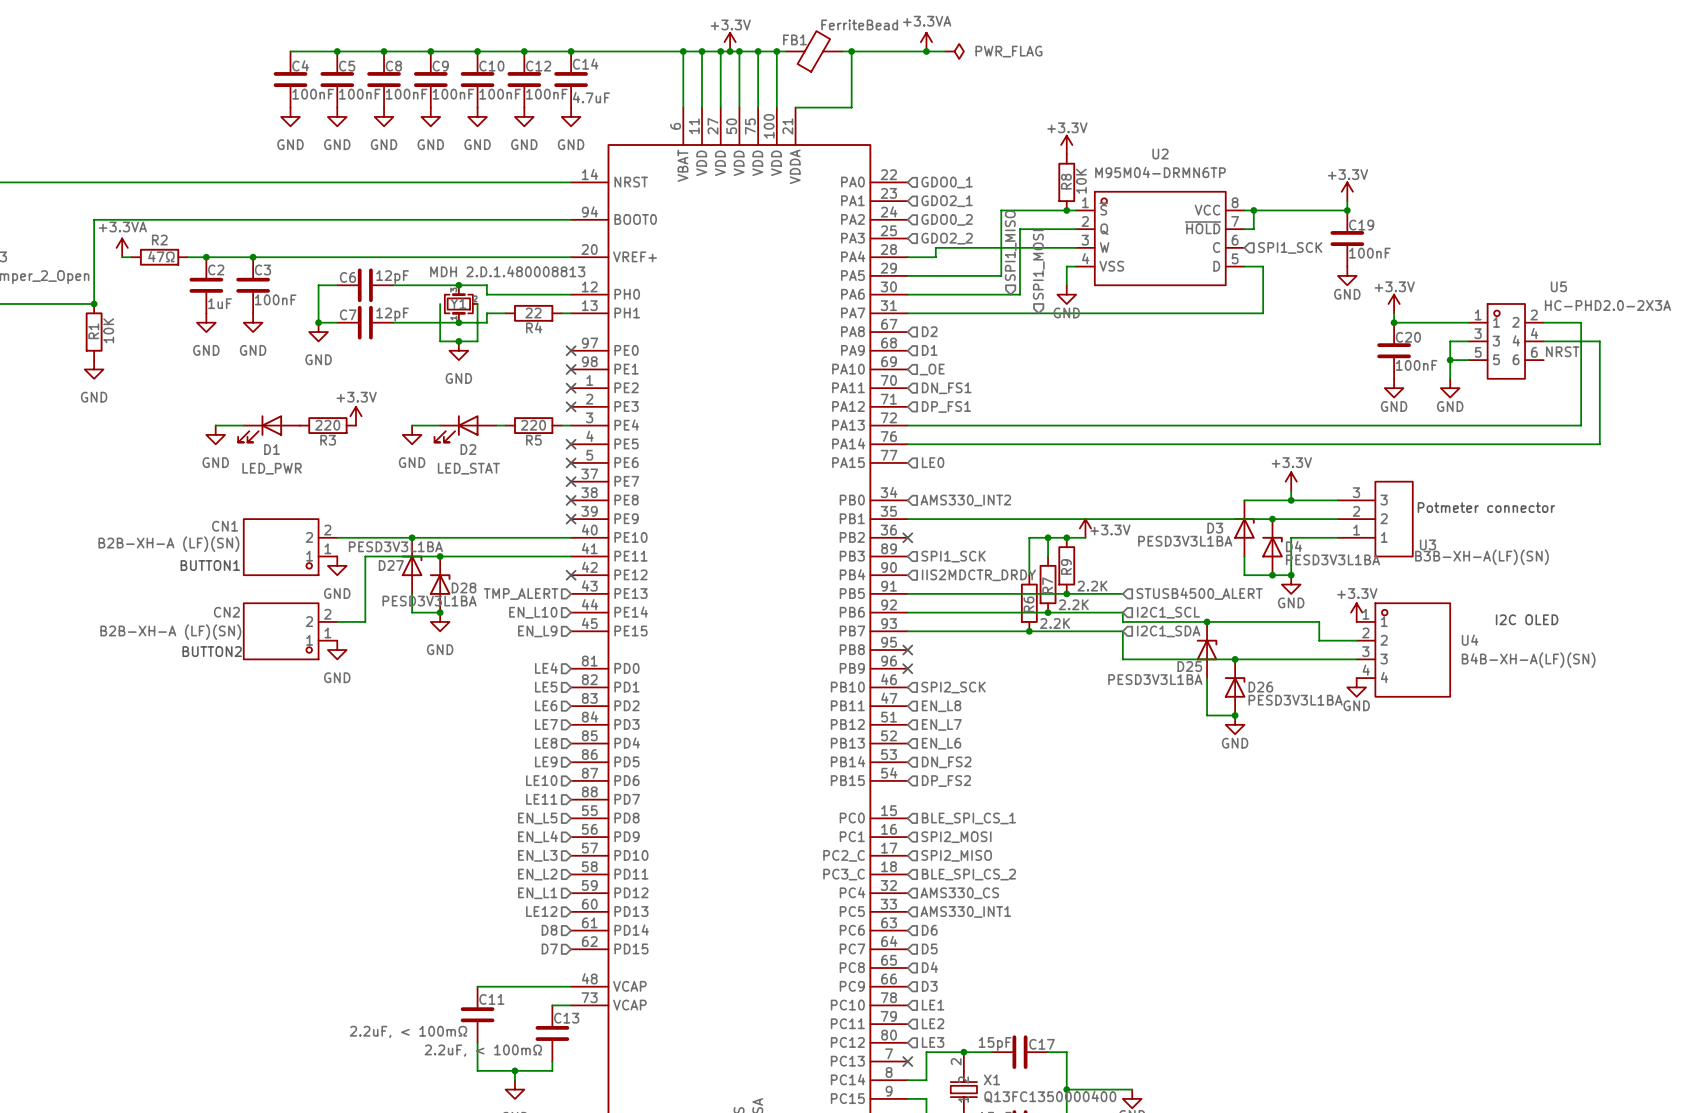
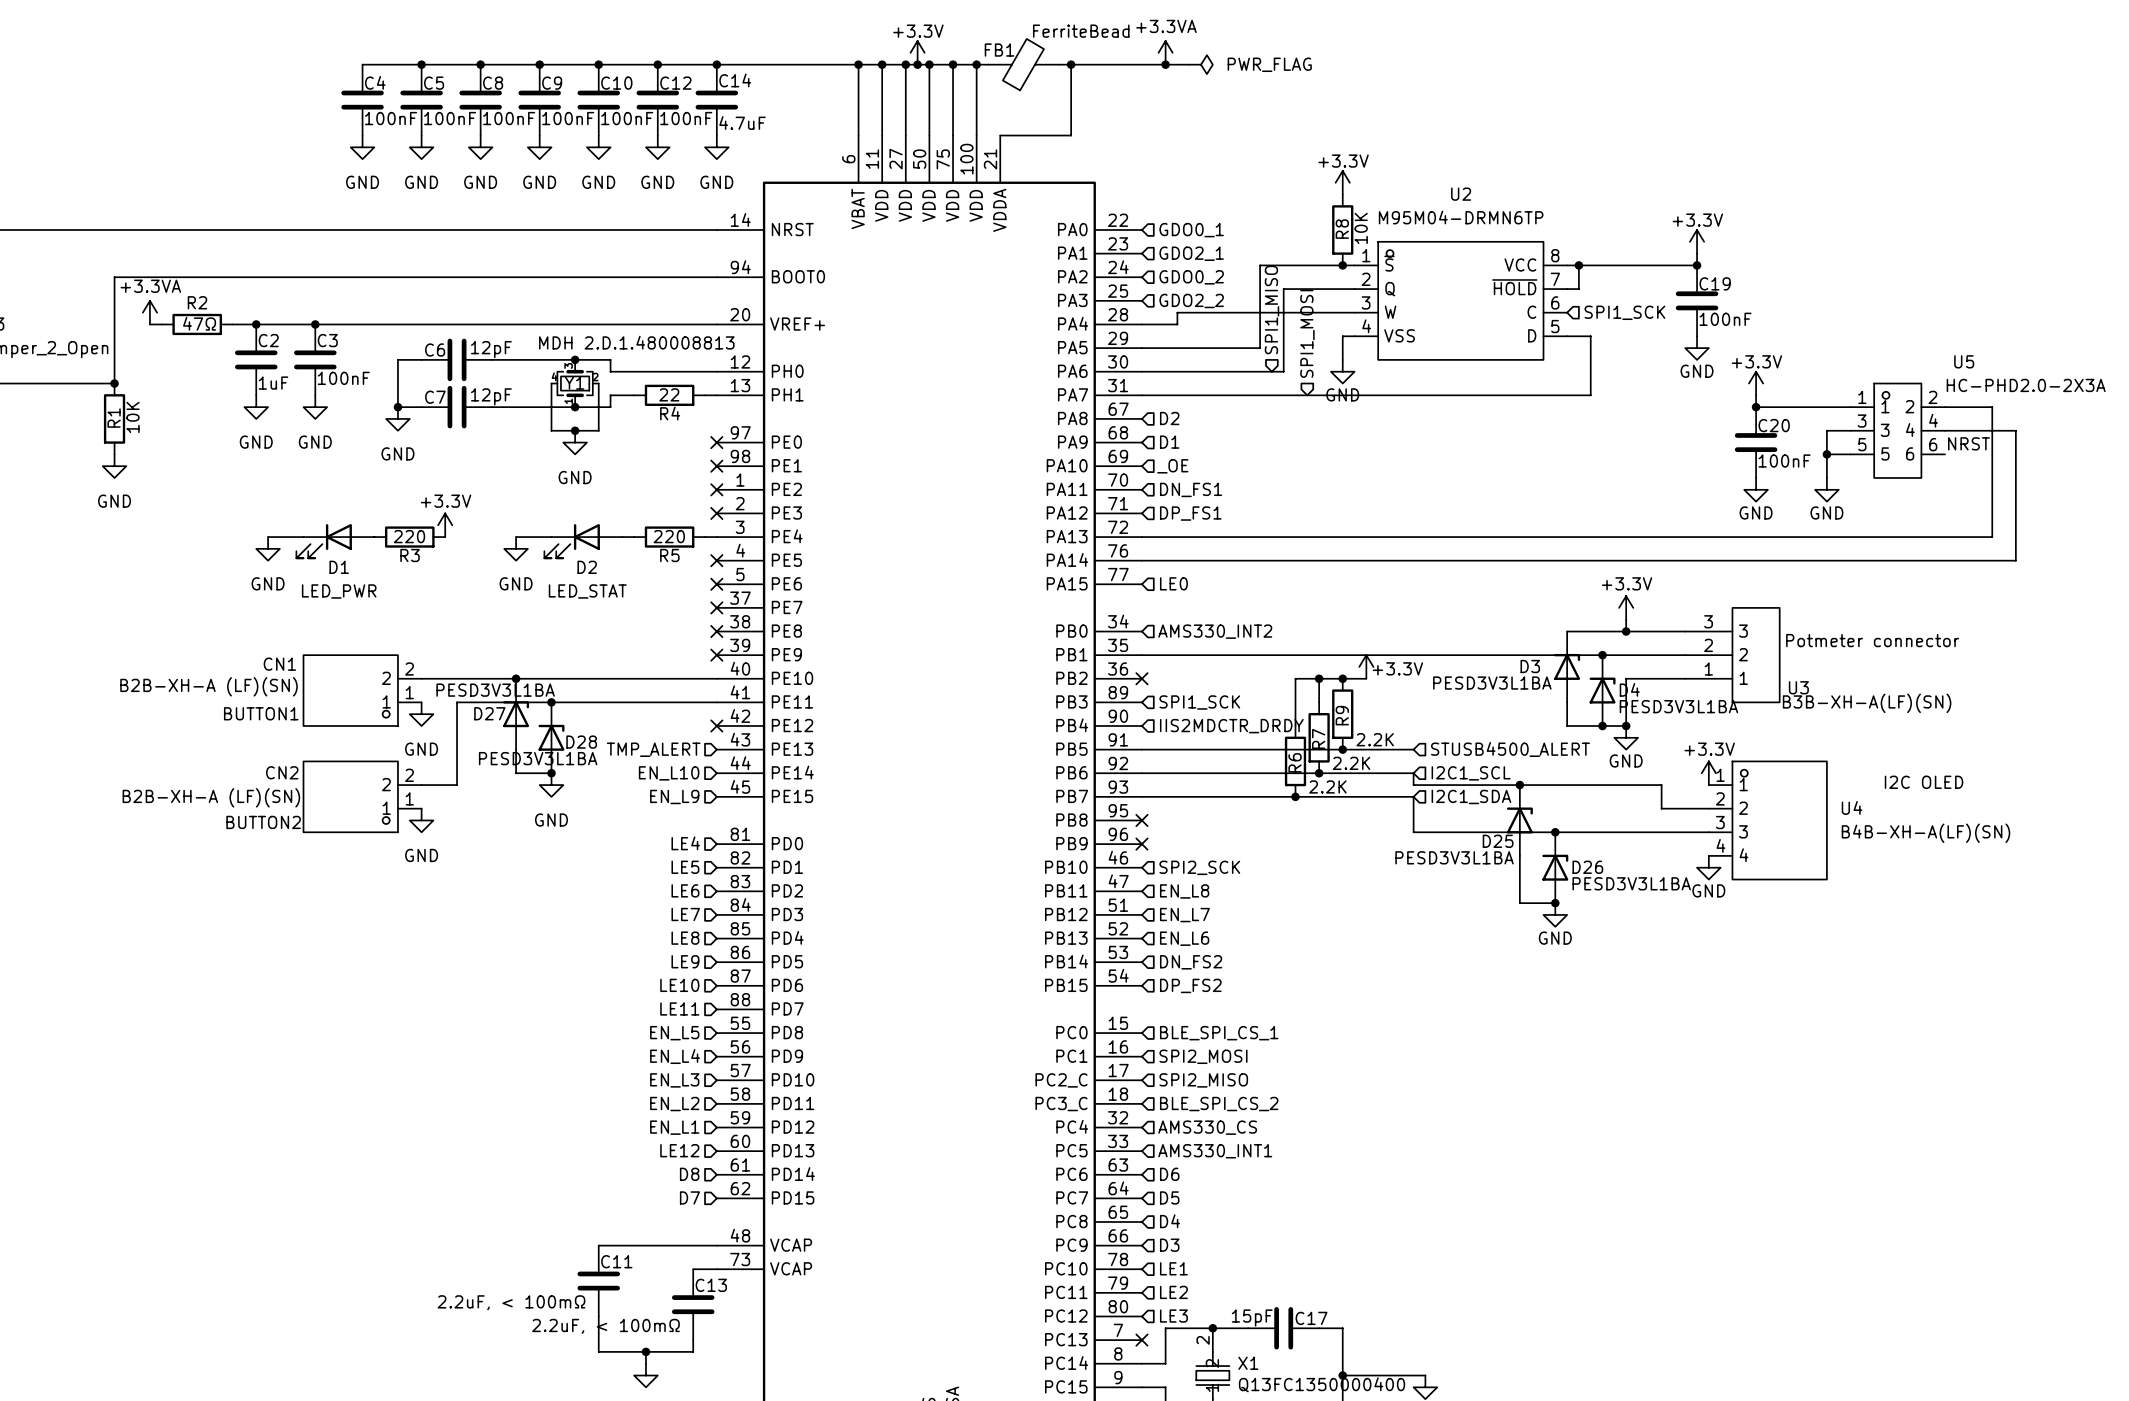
Y1 symbol: [444, 285, 478, 323] -> [551, 359, 599, 408]

